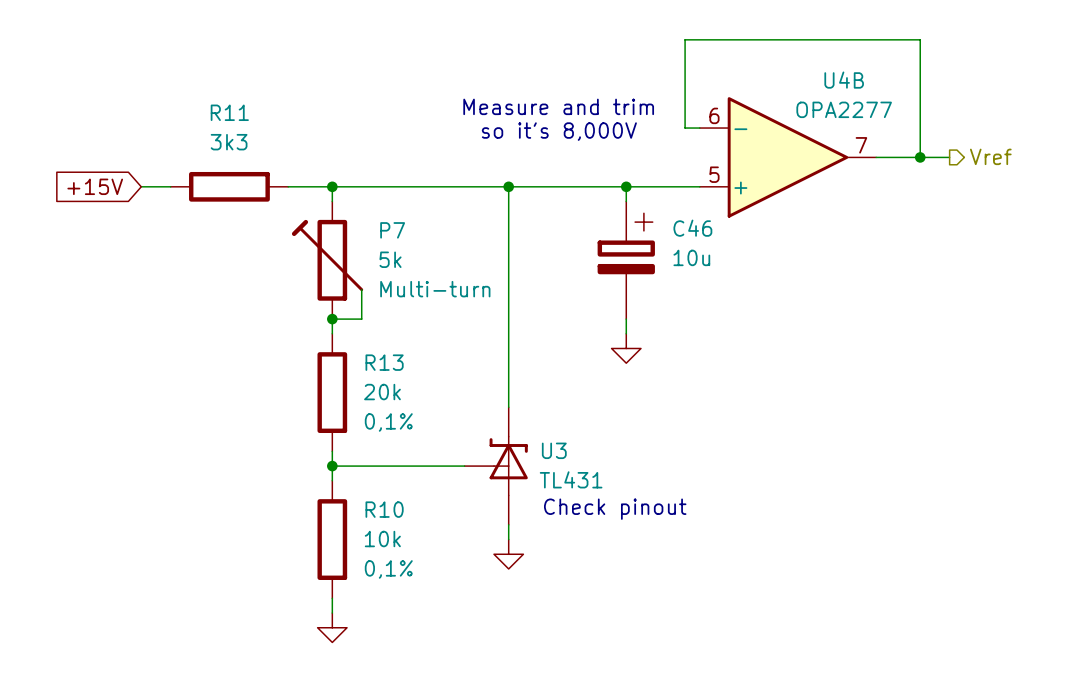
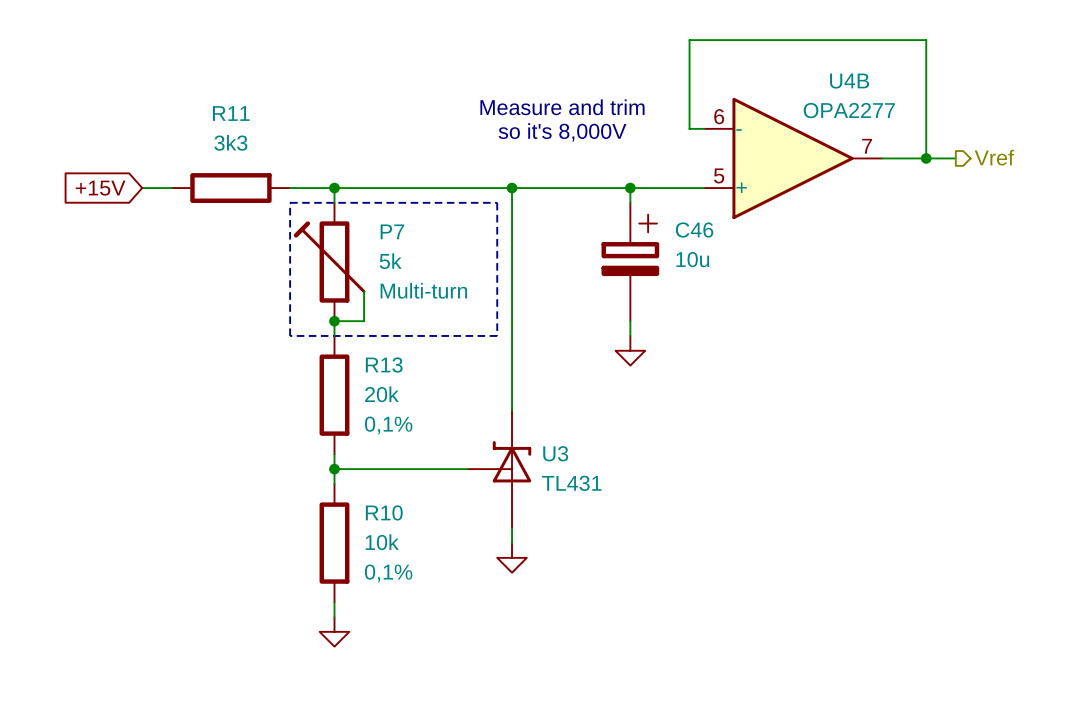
line: none -> (290, 202) (497, 202) (497, 335) (290, 335) (290, 202)
text: Check pinout (615, 509) -> none

